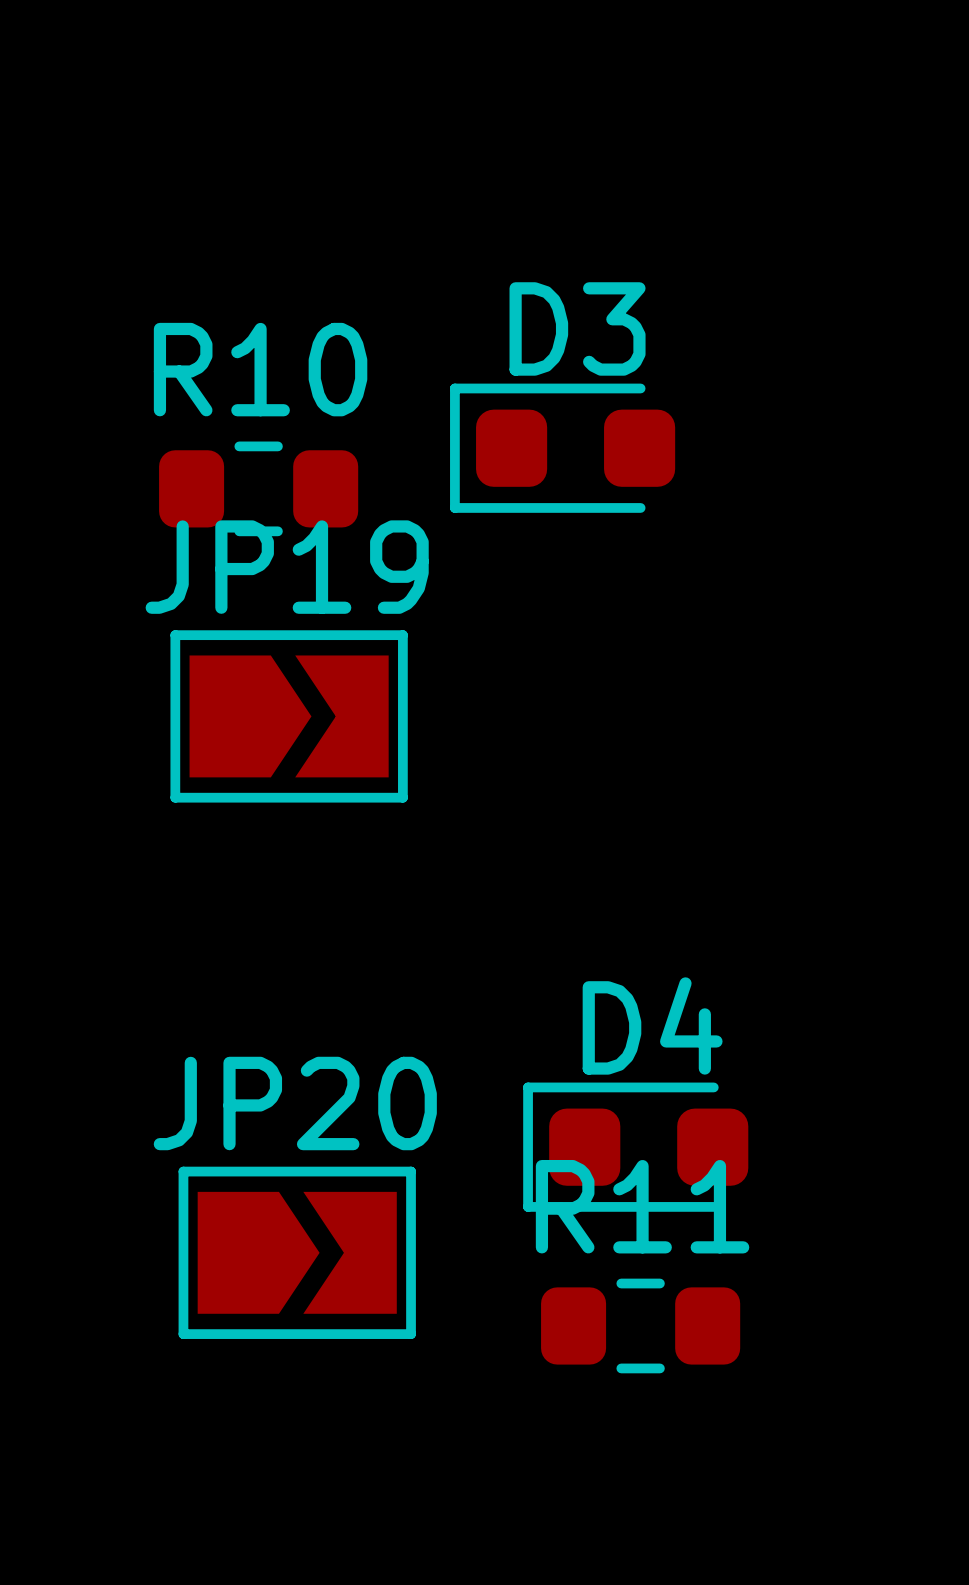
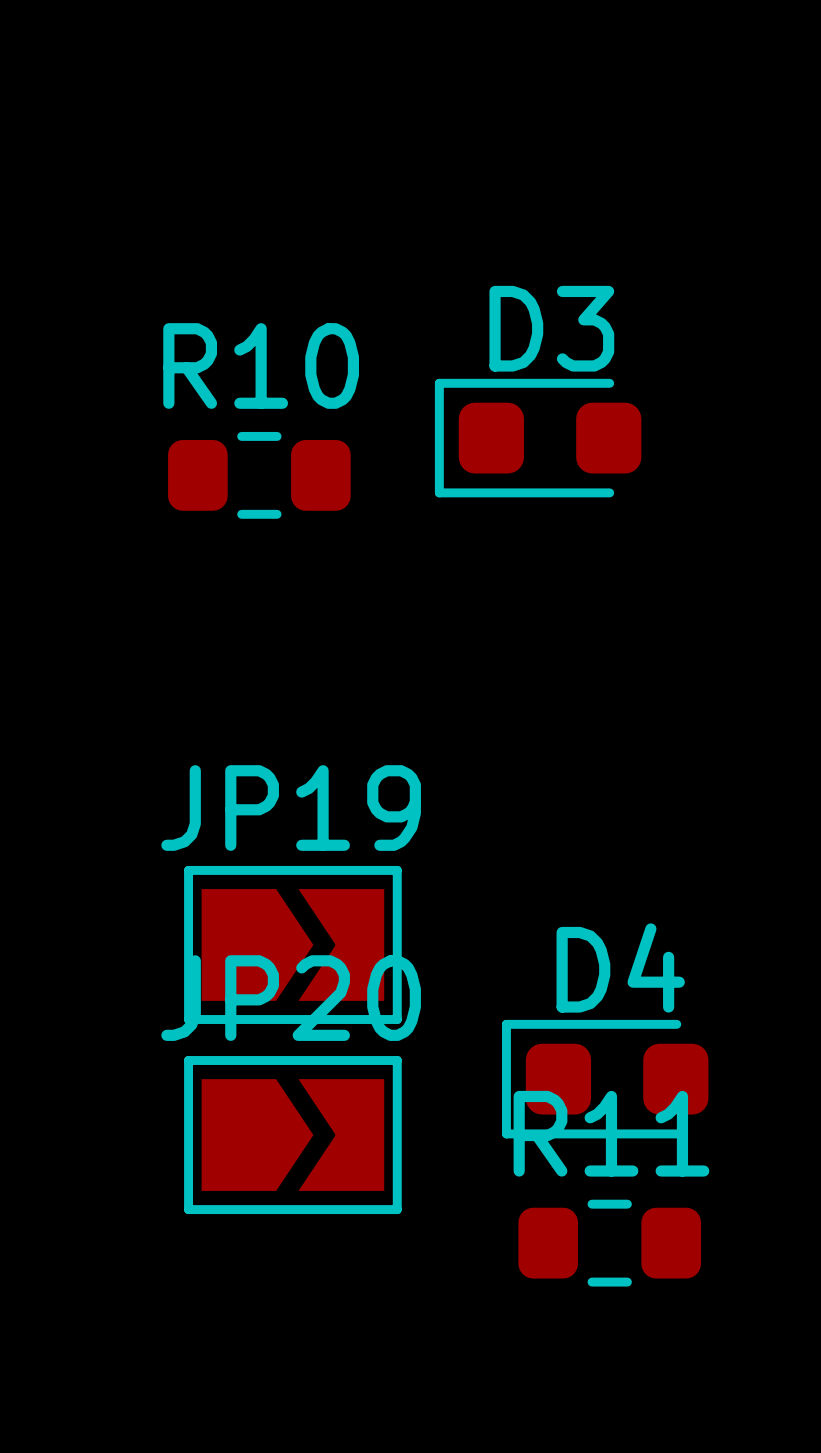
JP19 position: (289, 716) -> (292, 944)
JP20 position: (297, 1252) -> (292, 1135)

